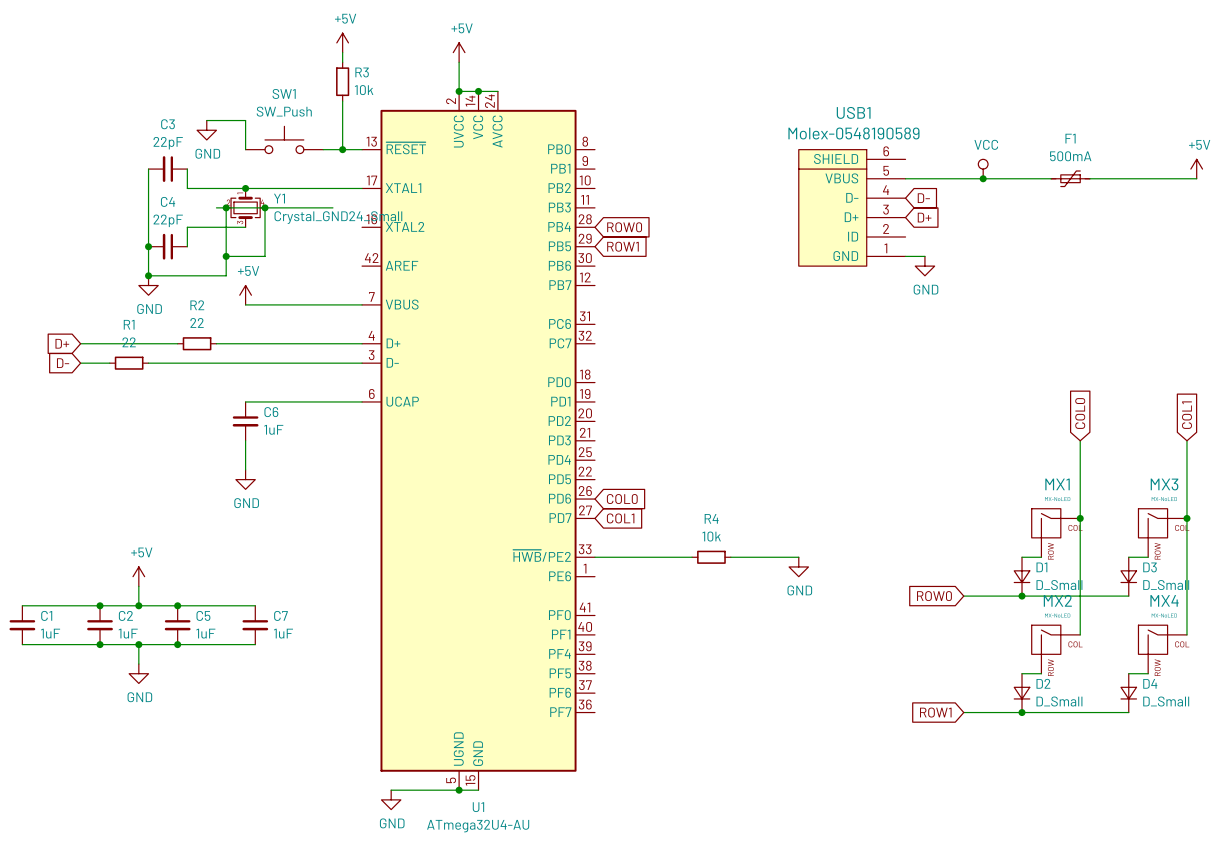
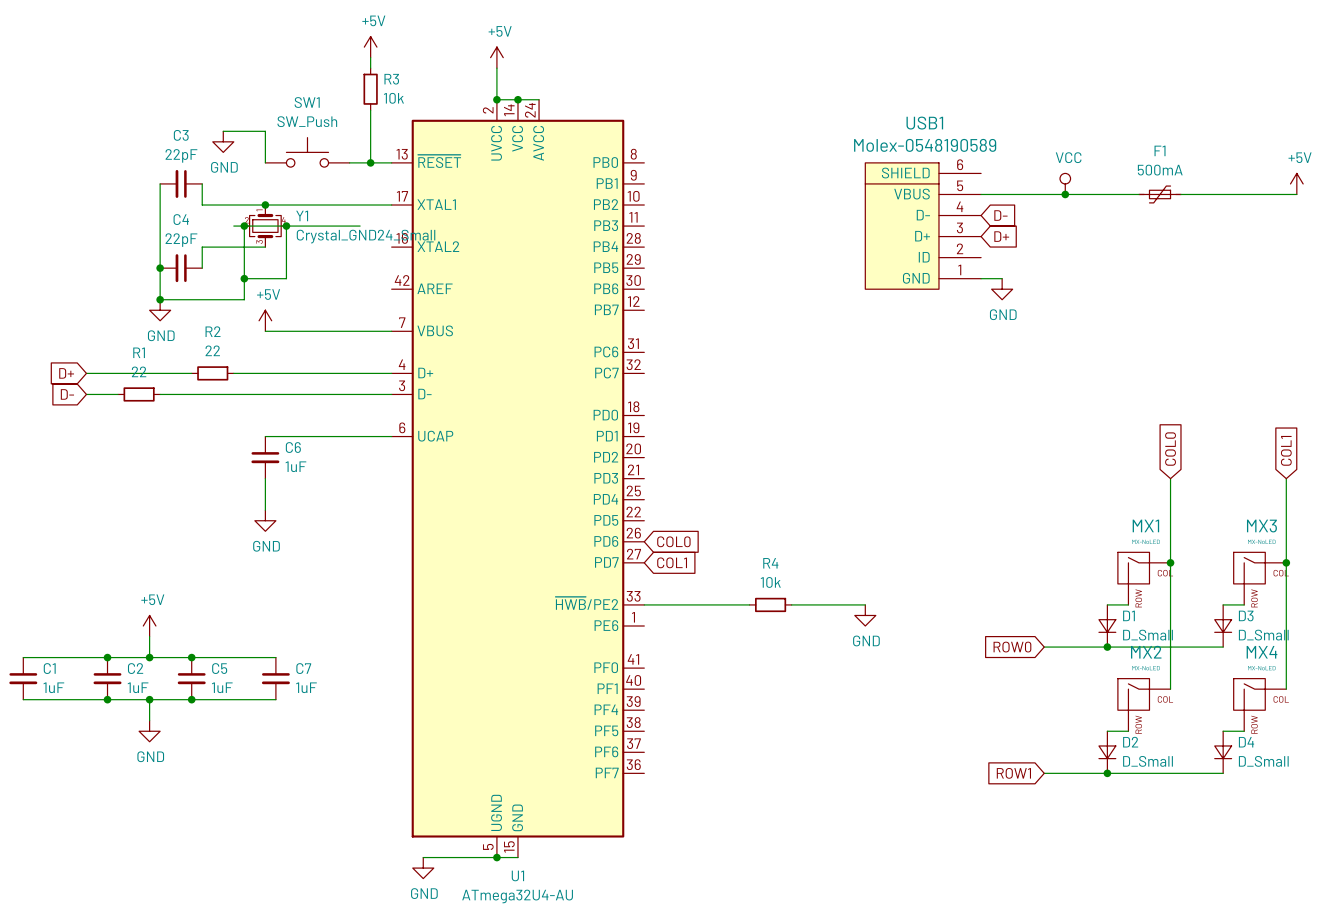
global label: ROW0 (624, 227) -> none
global label: ROW1 (622, 246) -> none

